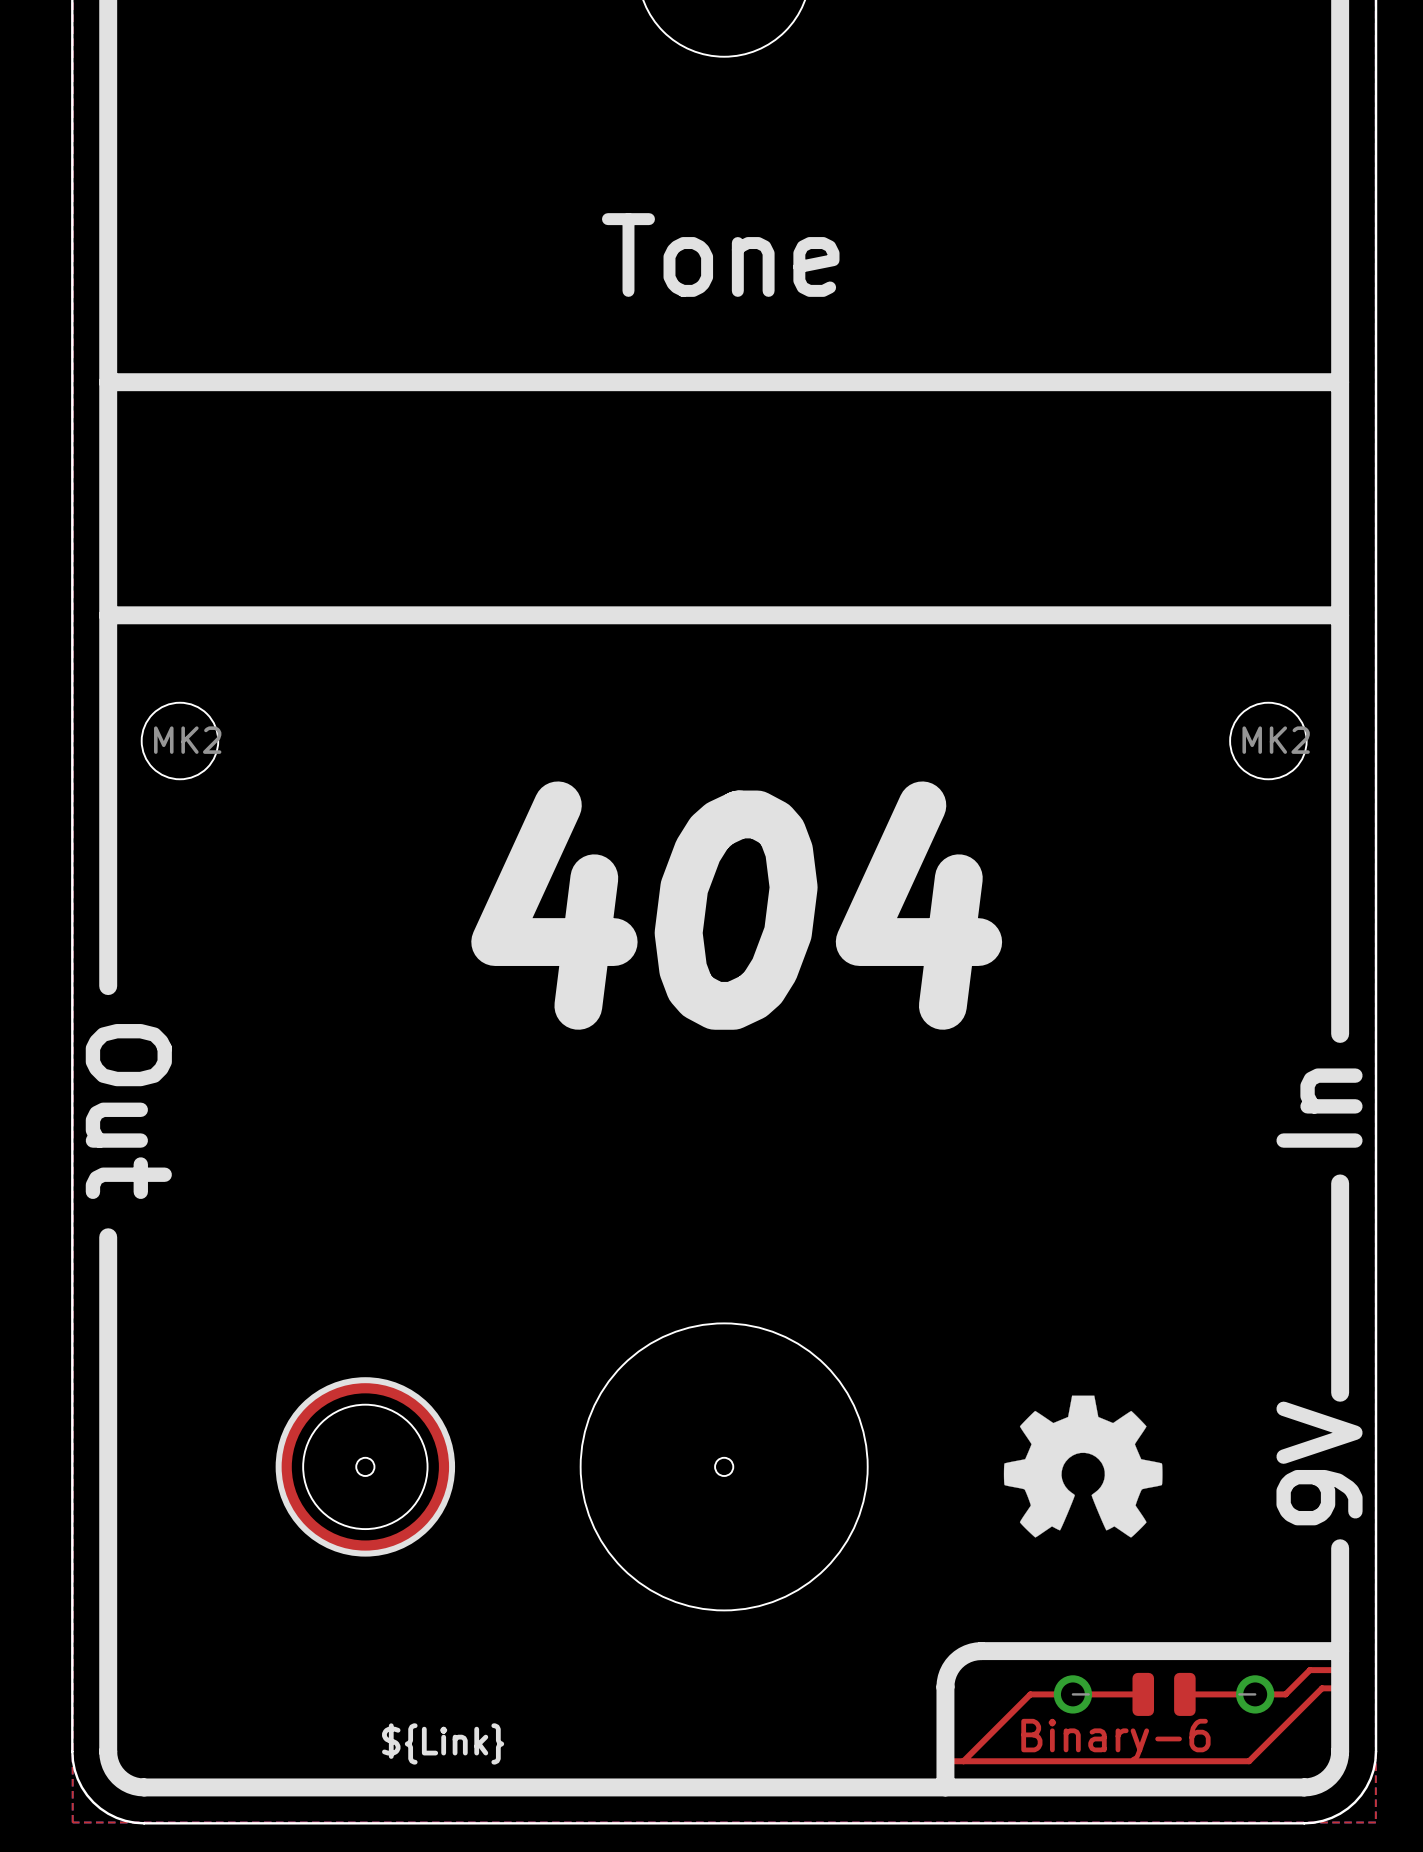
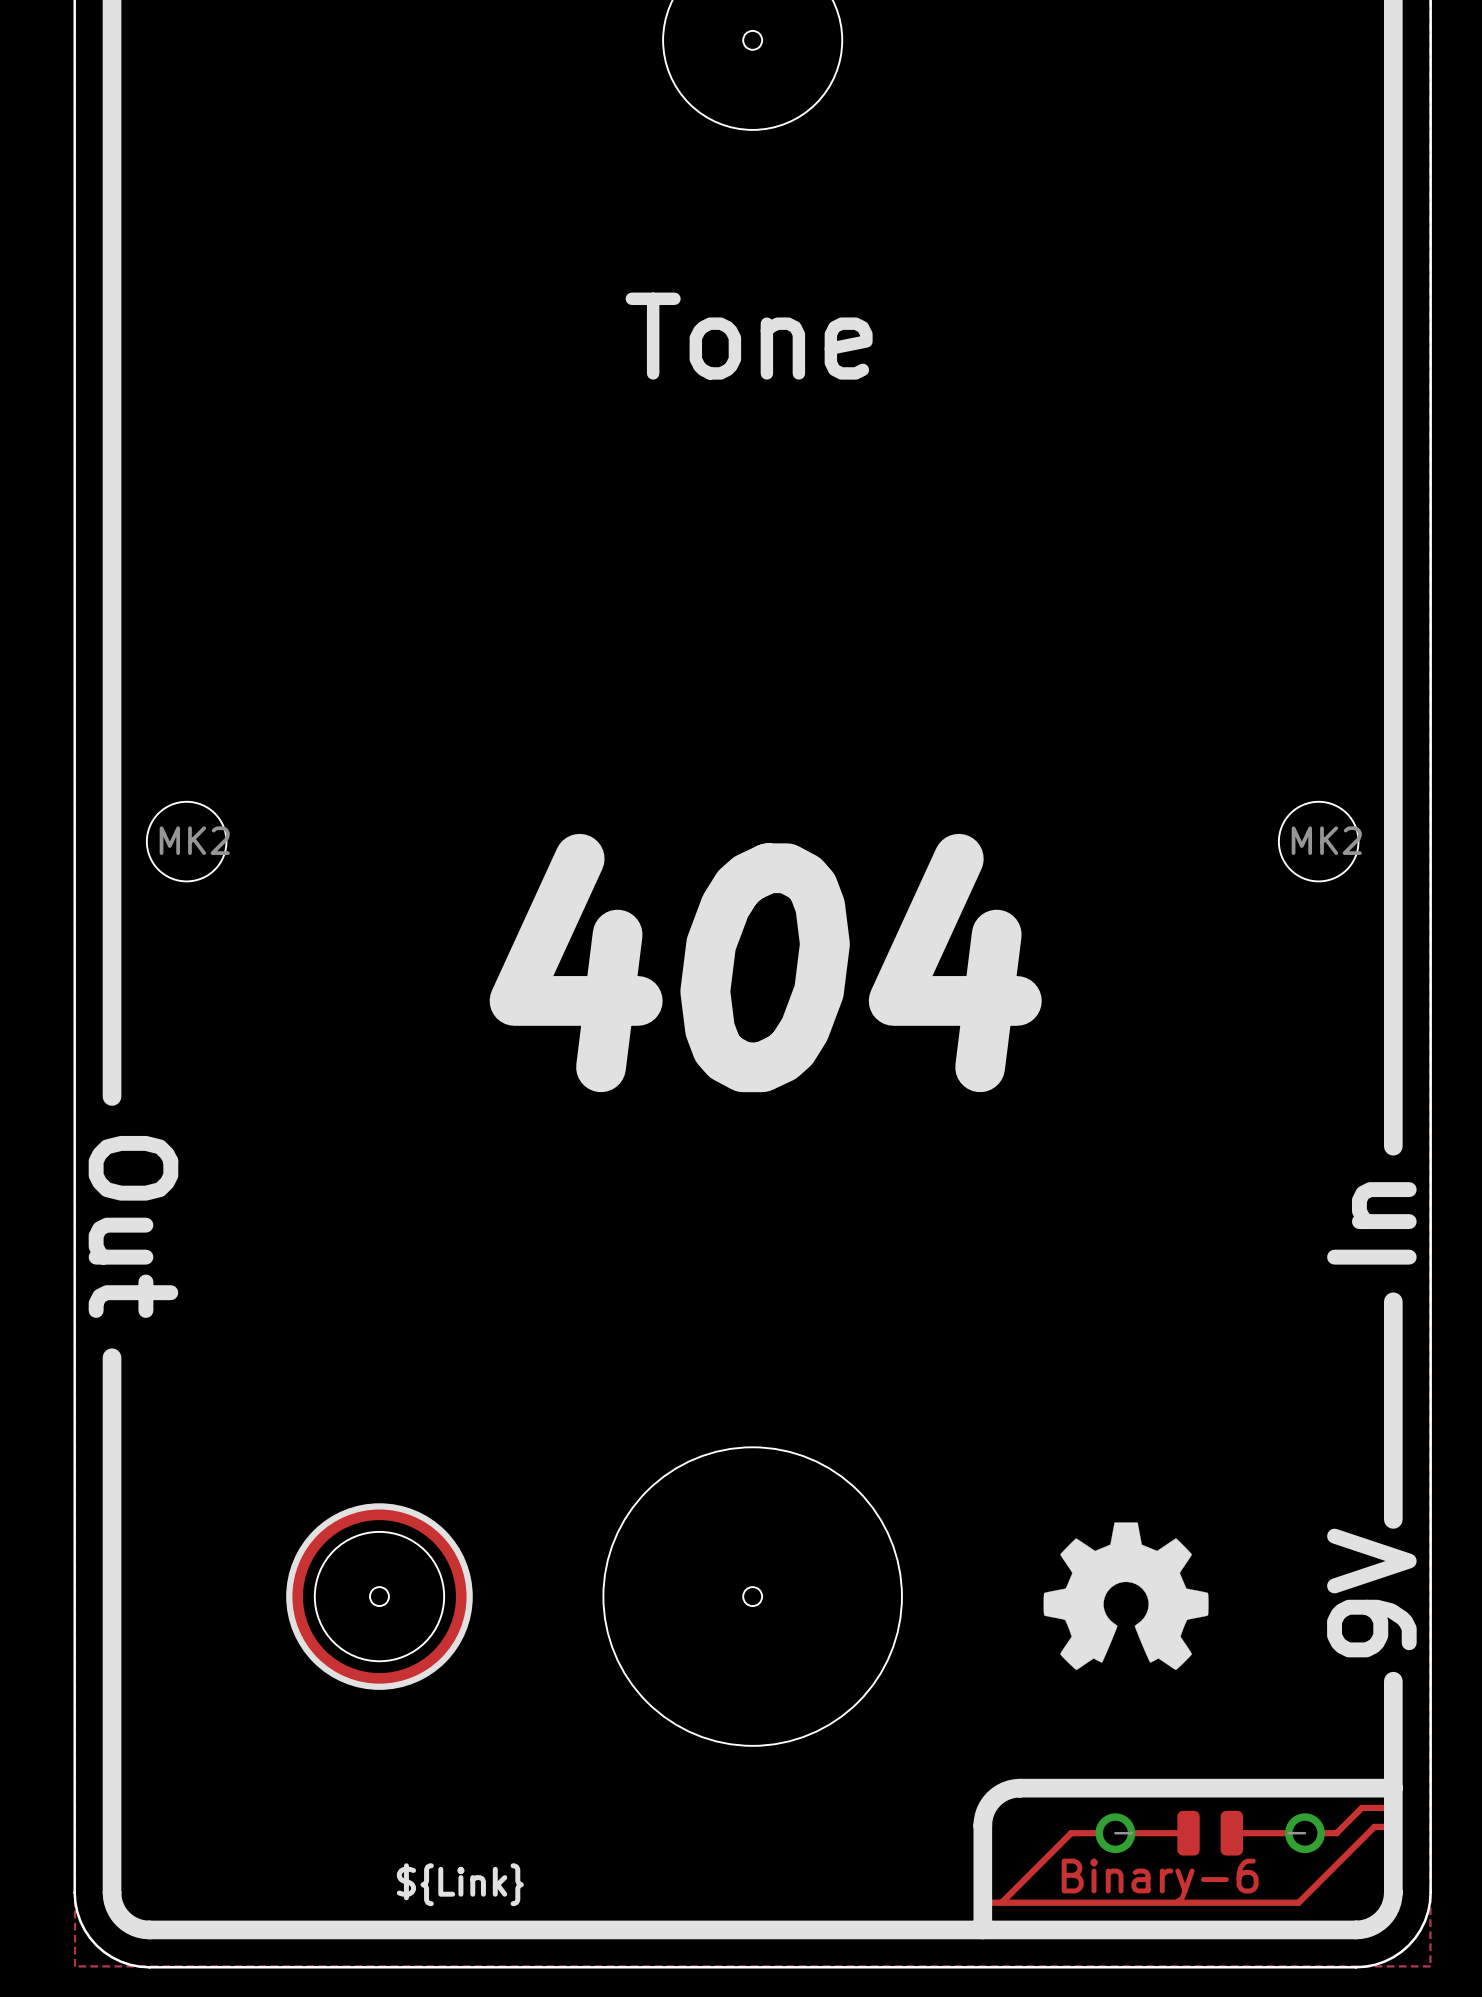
line: (108, 382) (1340, 382) -> none
line: (108, 615) (1340, 615) -> none
text position: 404 (736, 905) -> 404 (765, 963)

